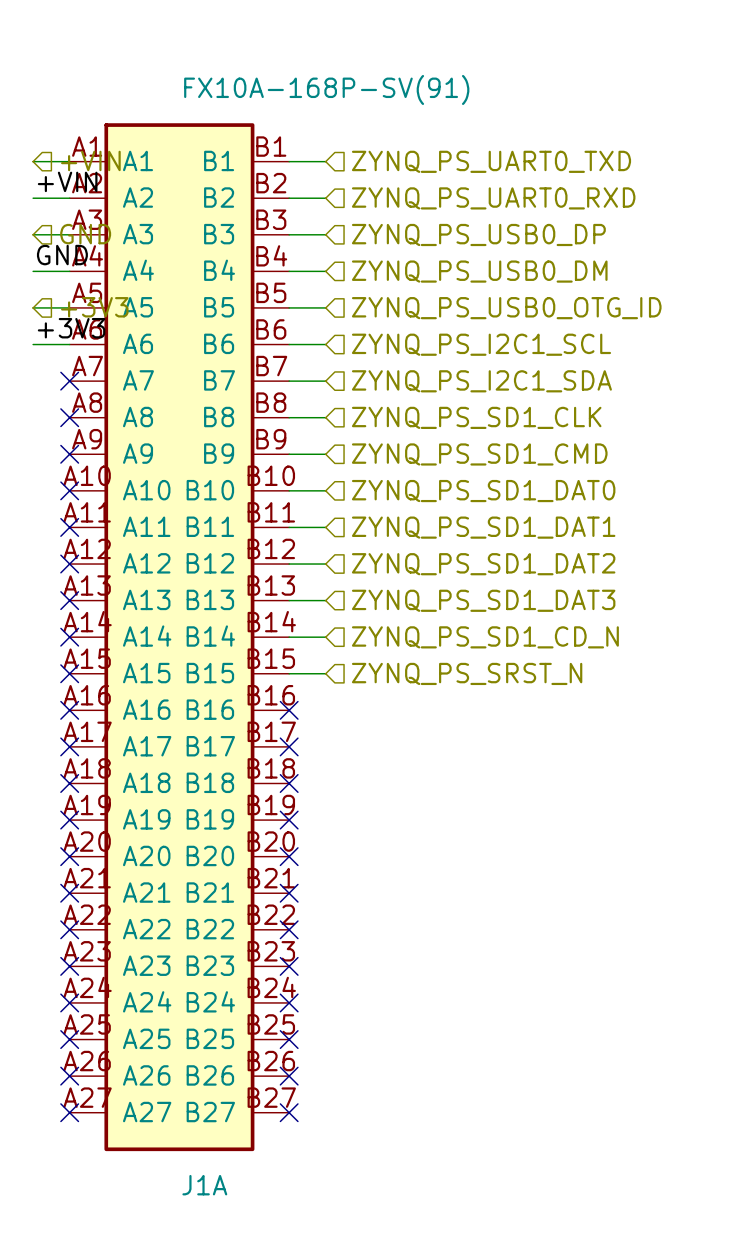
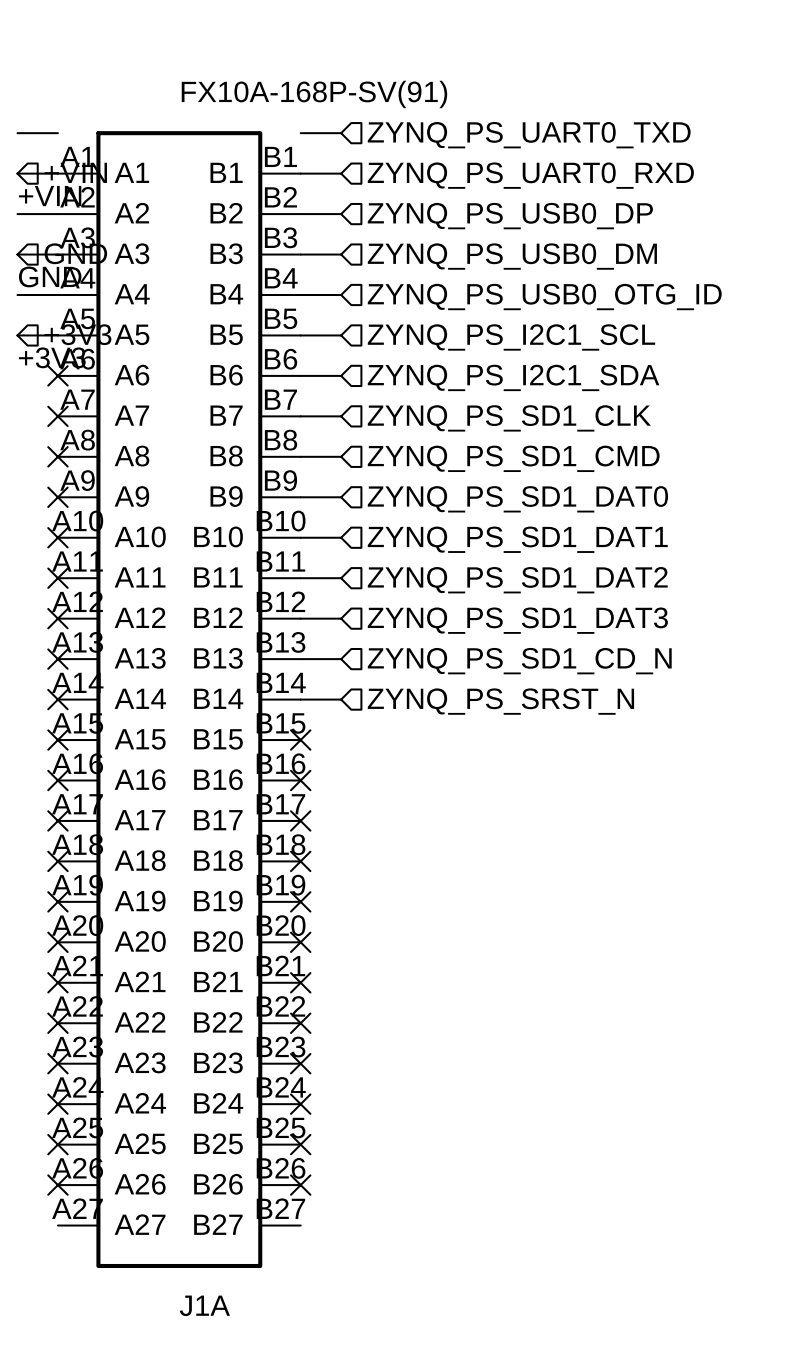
wire: none -> (300, 133) (341, 133)
hierarchical label: none -> ZYNQ_PS_UART0_TXD (529, 135)
hierarchical label: ZYNQ_PS_UART0_TXD (491, 161) -> ZYNQ_PS_UART0_RXD (530, 175)
hierarchical label: ZYNQ_PS_UART0_RXD (493, 198) -> ZYNQ_PS_USB0_DP (510, 216)
hierarchical label: ZYNQ_PS_USB0_DP (478, 234) -> ZYNQ_PS_USB0_DM (512, 256)
hierarchical label: ZYNQ_PS_USB0_DM (479, 271) -> ZYNQ_PS_USB0_OTG_ID (544, 297)
hierarchical label: ZYNQ_PS_USB0_OTG_ID (506, 308) -> ZYNQ_PS_I2C1_SCL (511, 337)
wire: (33, 344) (69, 344) -> (17, 133) (57, 133)
no-connect mark: none -> (57, 375)
hierarchical label: ZYNQ_PS_I2C1_SCL (481, 344) -> ZYNQ_PS_I2C1_SDA (513, 377)
hierarchical label: ZYNQ_PS_I2C1_SDA (481, 381) -> ZYNQ_PS_SD1_CLK (509, 418)
hierarchical label: ZYNQ_PS_SD1_CLK (476, 417) -> ZYNQ_PS_SD1_CMD (513, 458)
hierarchical label: ZYNQ_PS_SD1_CMD (479, 454) -> ZYNQ_PS_SD1_DAT0 (517, 499)
hierarchical label: ZYNQ_PS_SD1_DAT0 (483, 491) -> ZYNQ_PS_SD1_DAT1 (517, 539)
hierarchical label: ZYNQ_PS_SD1_DAT1 (483, 527) -> ZYNQ_PS_SD1_DAT2 (517, 580)
hierarchical label: ZYNQ_PS_SD1_DAT2 (483, 564) -> ZYNQ_PS_SD1_DAT3 (517, 620)
hierarchical label: ZYNQ_PS_SD1_DAT3 (483, 600) -> ZYNQ_PS_SD1_CD_N (519, 661)
hierarchical label: ZYNQ_PS_SD1_CD_N (485, 637) -> ZYNQ_PS_SRST_N (500, 701)
wire: (289, 673) (325, 673) -> none
no-connect mark: none -> (300, 740)
hierarchical label: ZYNQ_PS_SRST_N (467, 673) -> none
no-connect mark: (69, 1112) -> none
no-connect mark: (289, 1112) -> none

